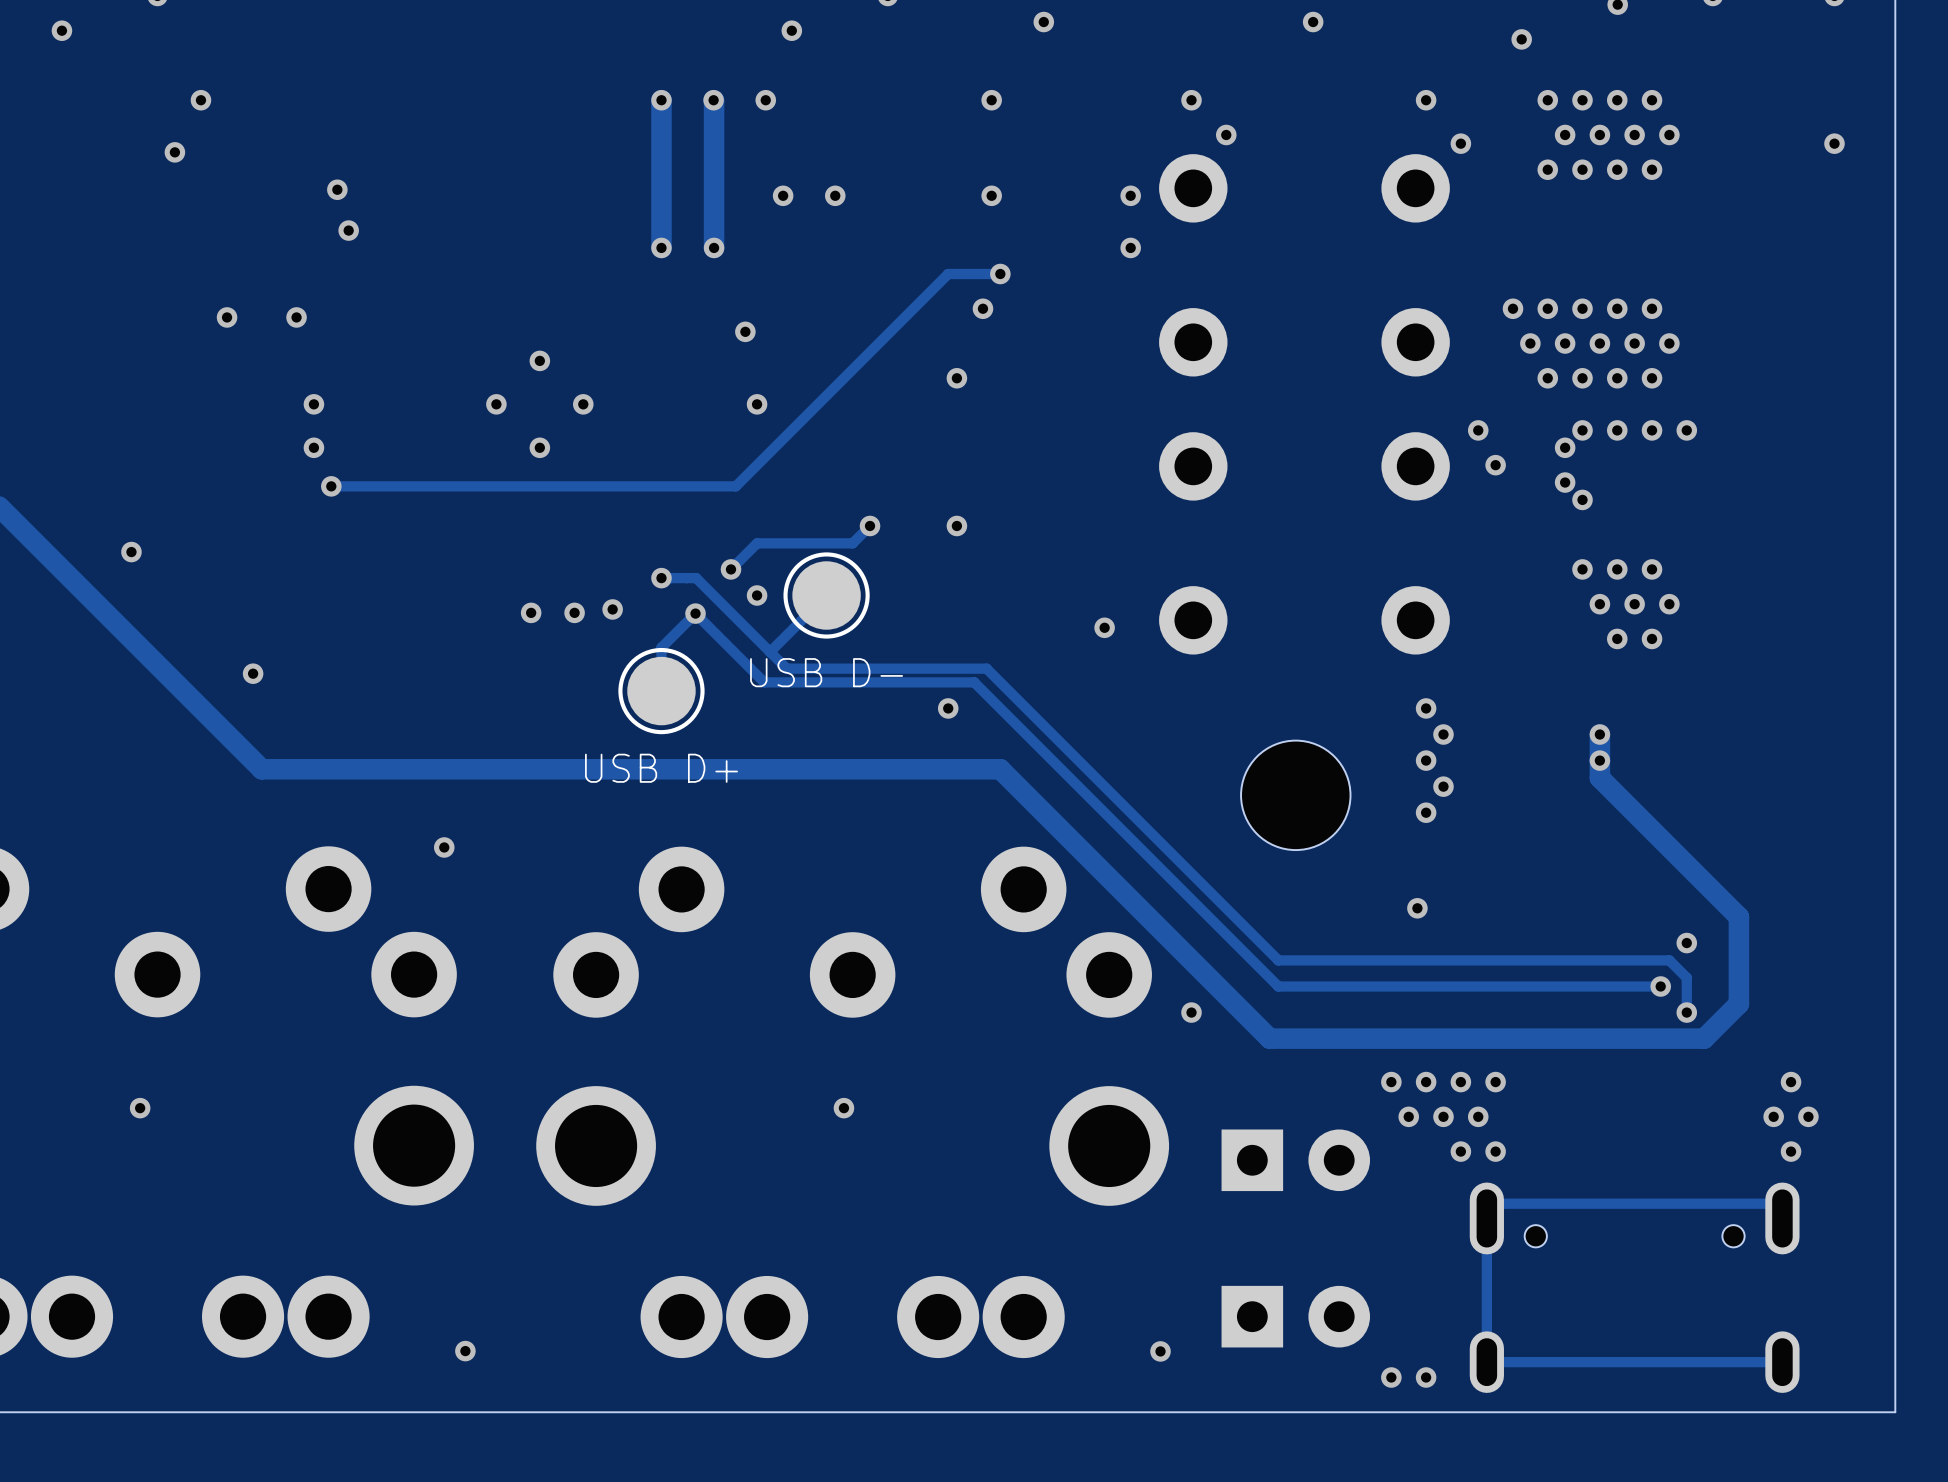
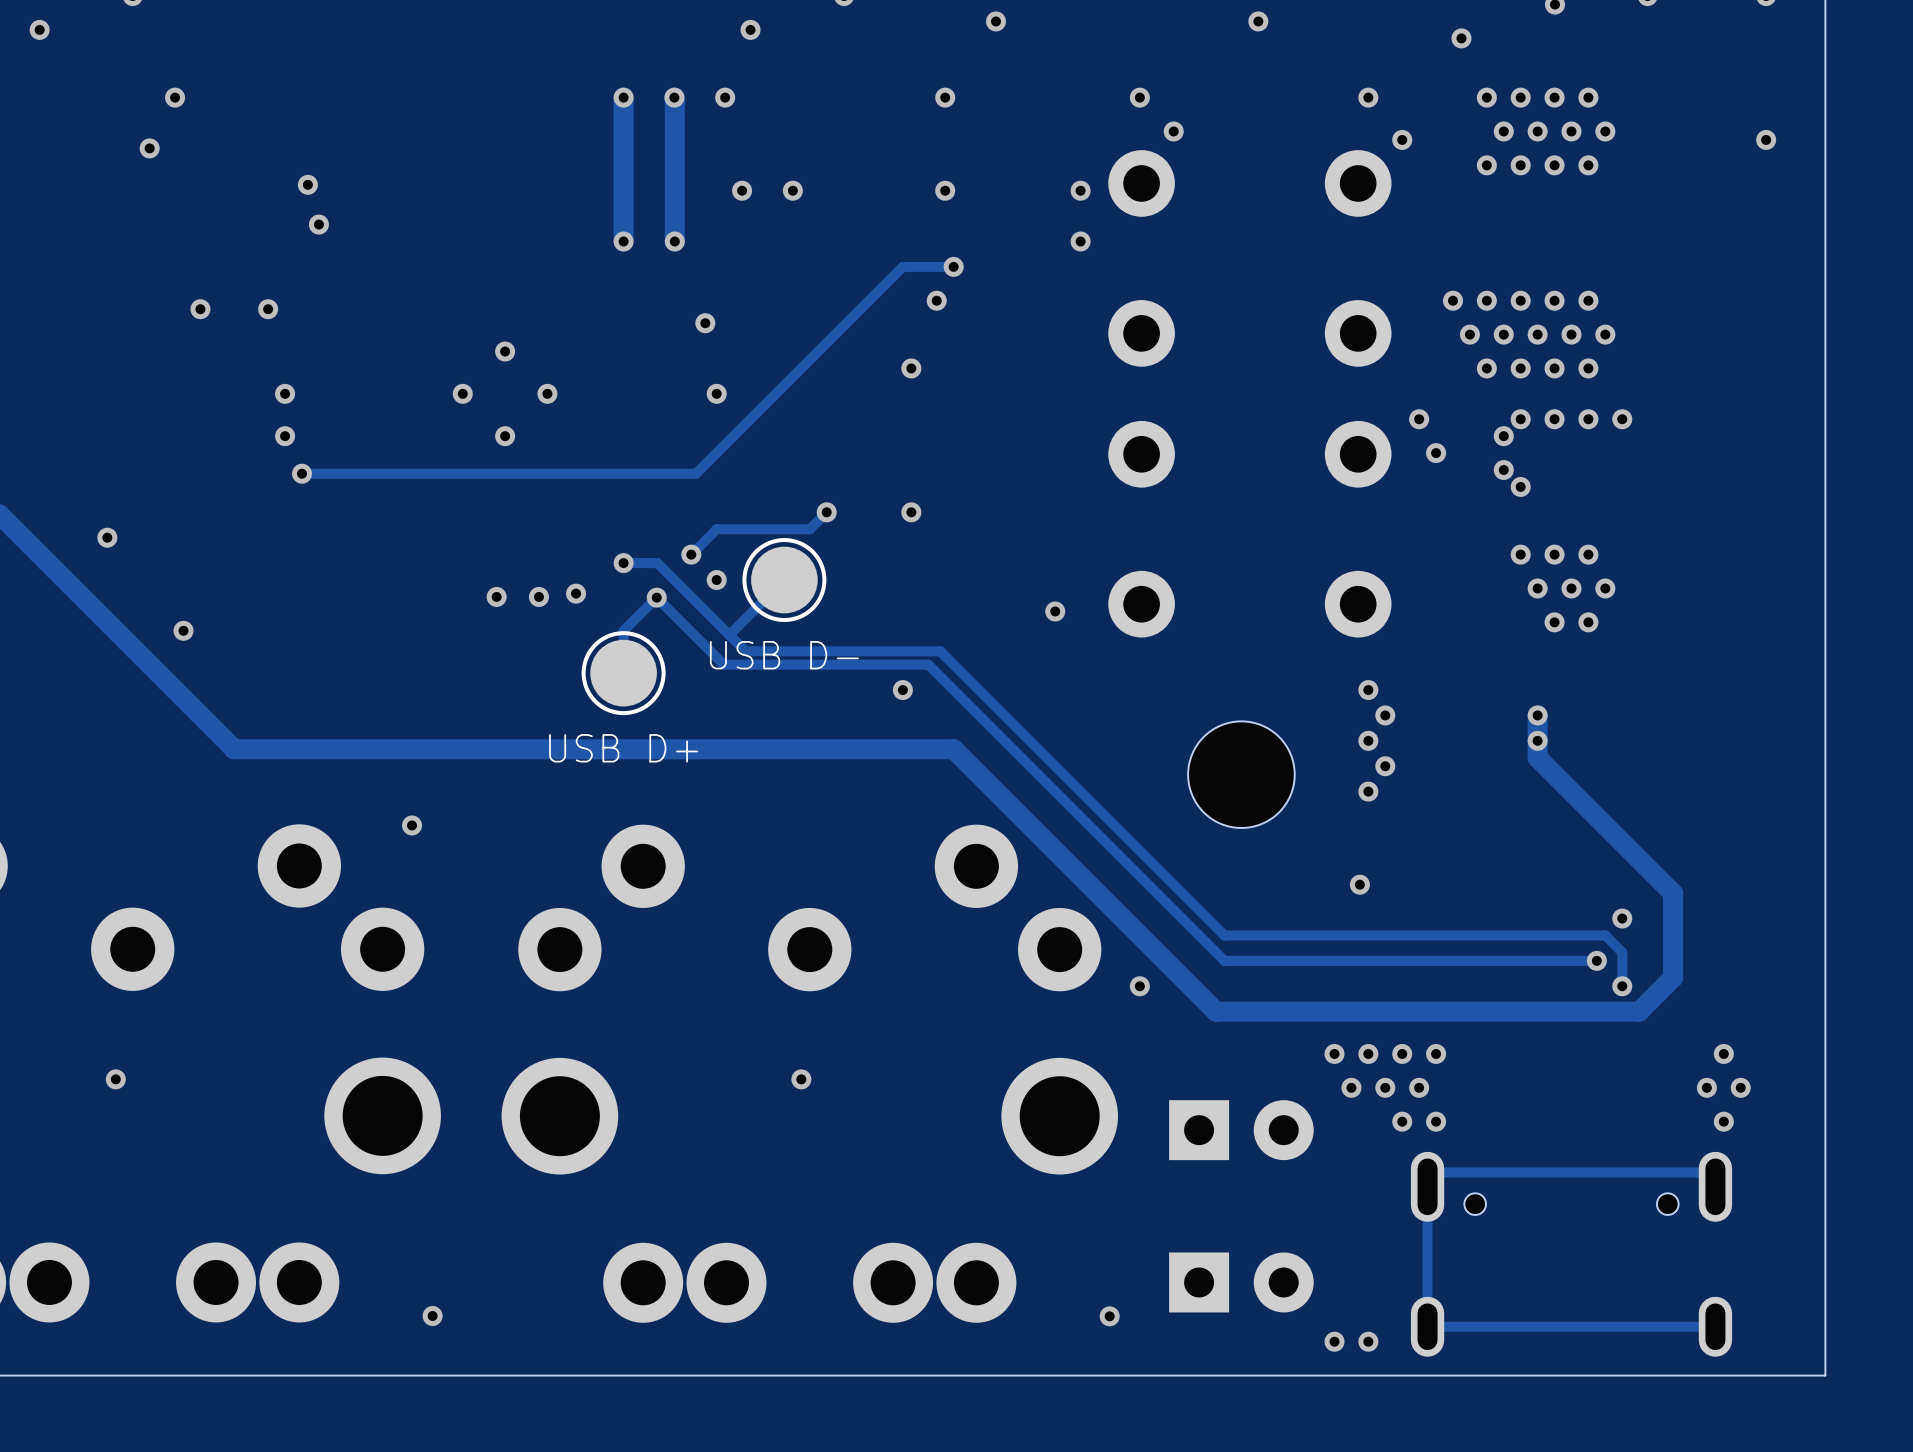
via position: (253, 673) -> (183, 630)

